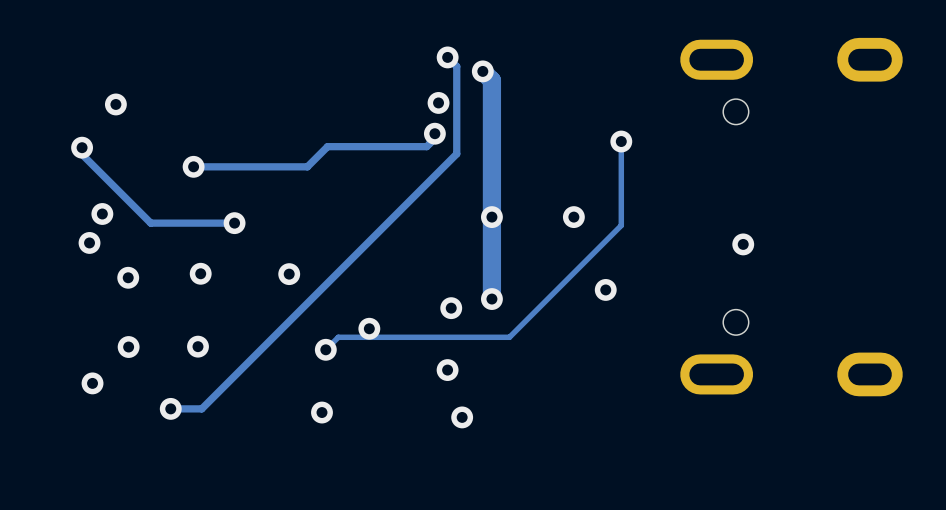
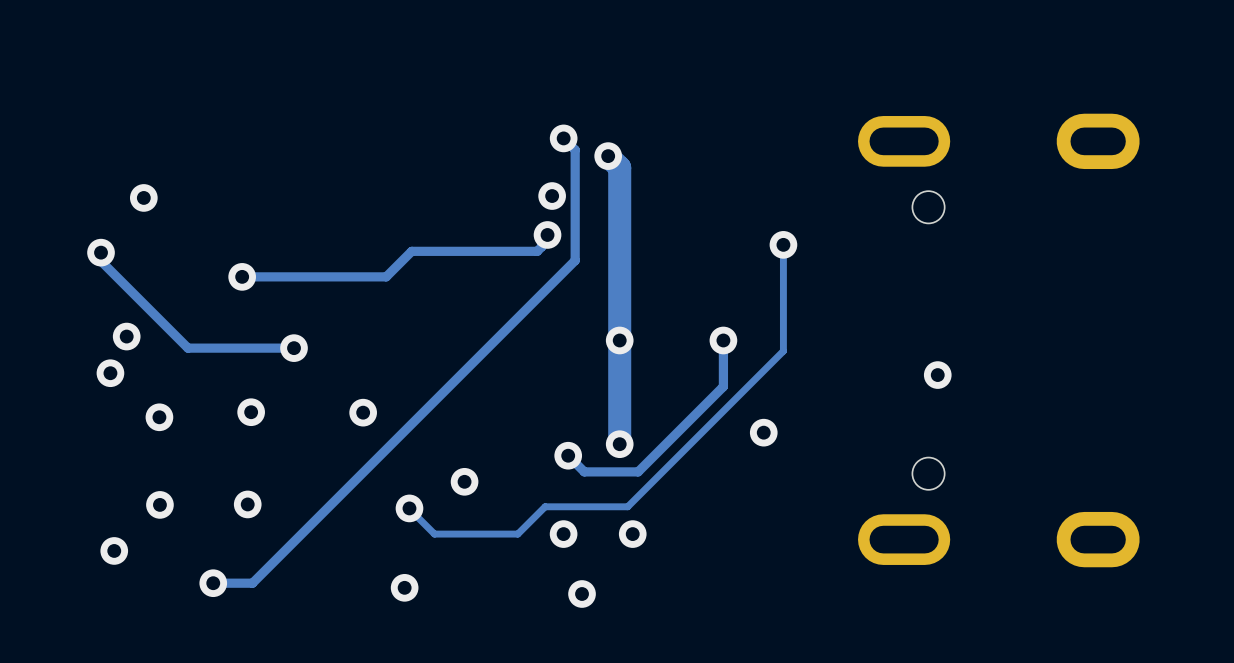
track: none -> (723, 340) (723, 386) (638, 471) (584, 471) (568, 455)
track: (509, 337) (338, 337) (325, 349) -> (641, 492) (627, 506) (545, 506) (517, 534) (434, 534) (409, 509)
via: none -> (632, 534)

